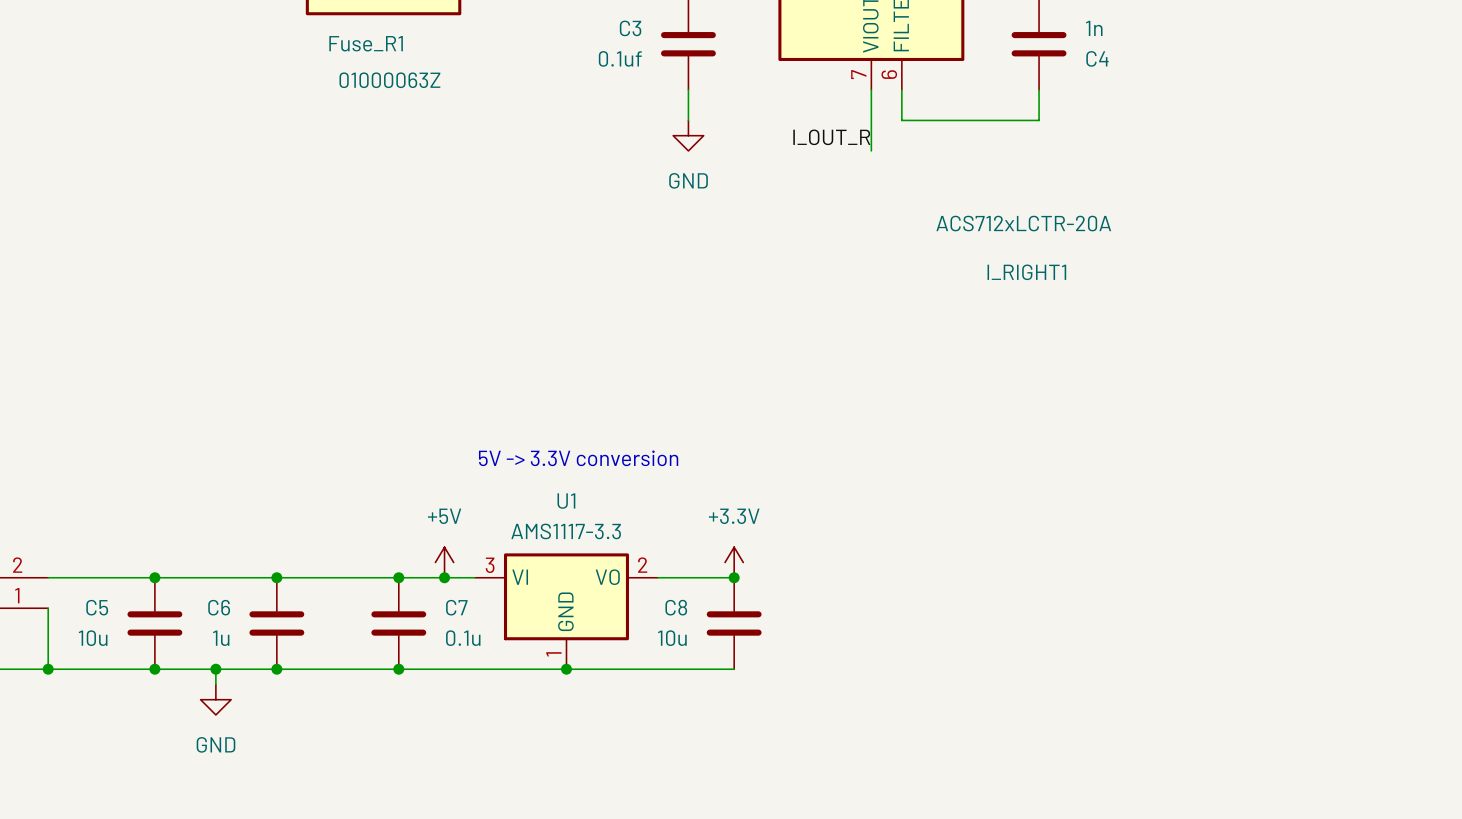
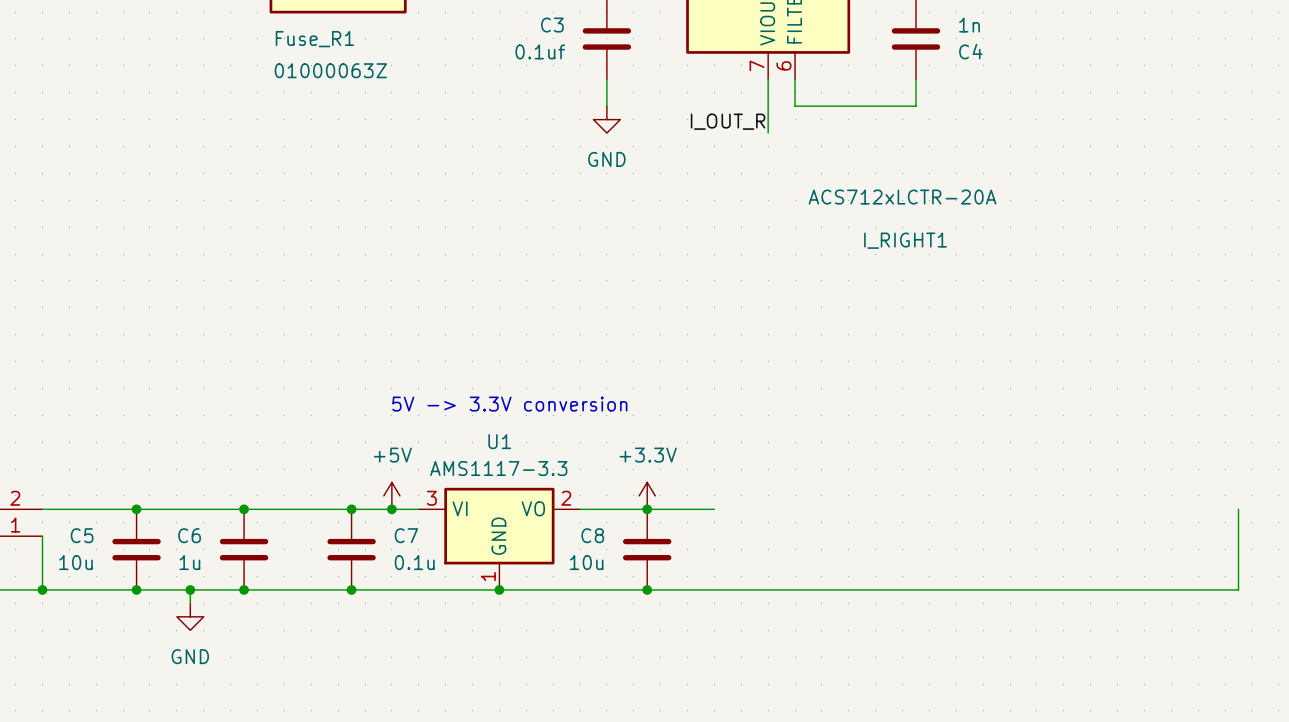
wire: none -> (647, 509) (714, 509)
wire: none -> (1238, 509) (1238, 589) (647, 589)
junction: none -> (647, 589)

